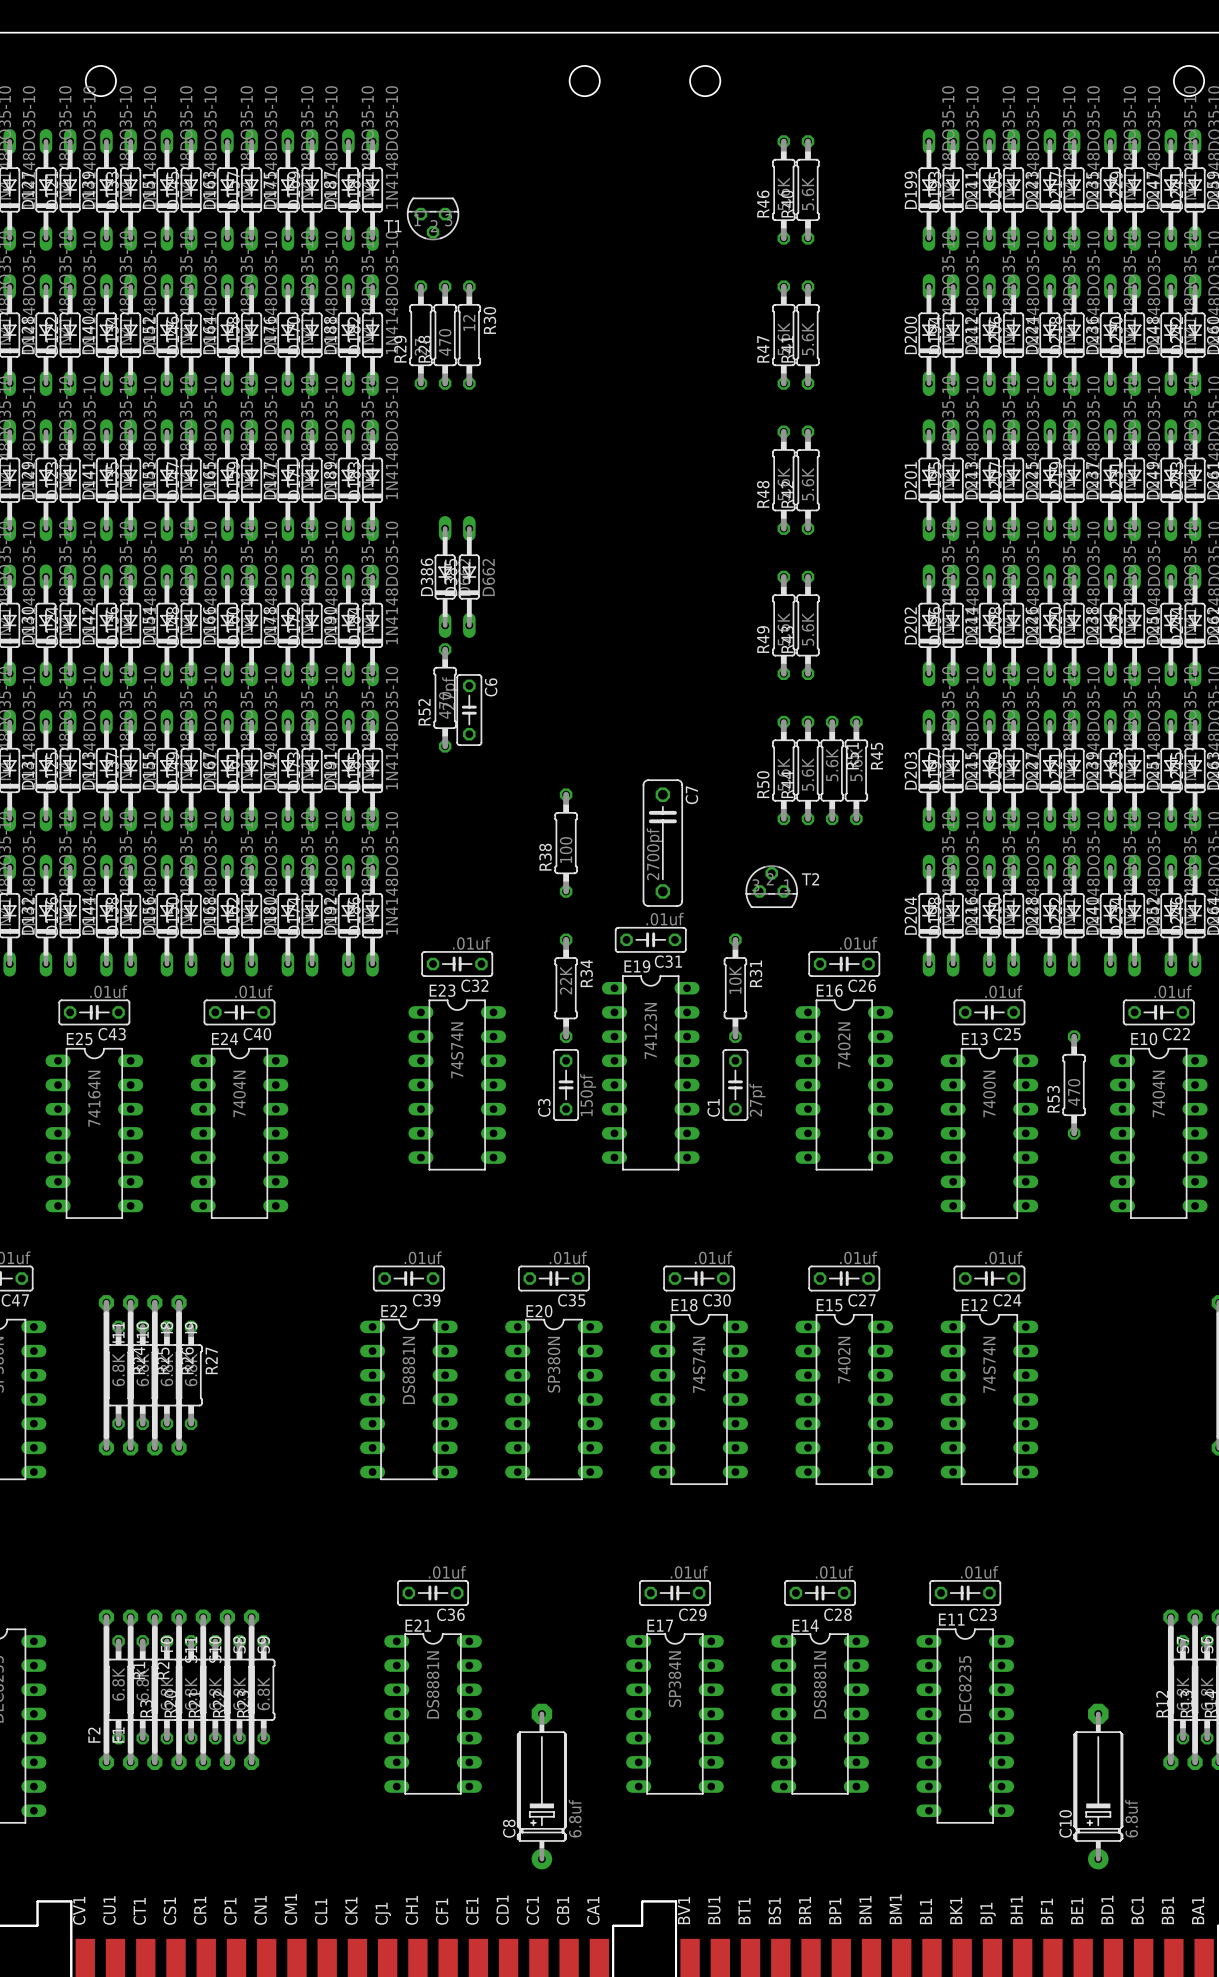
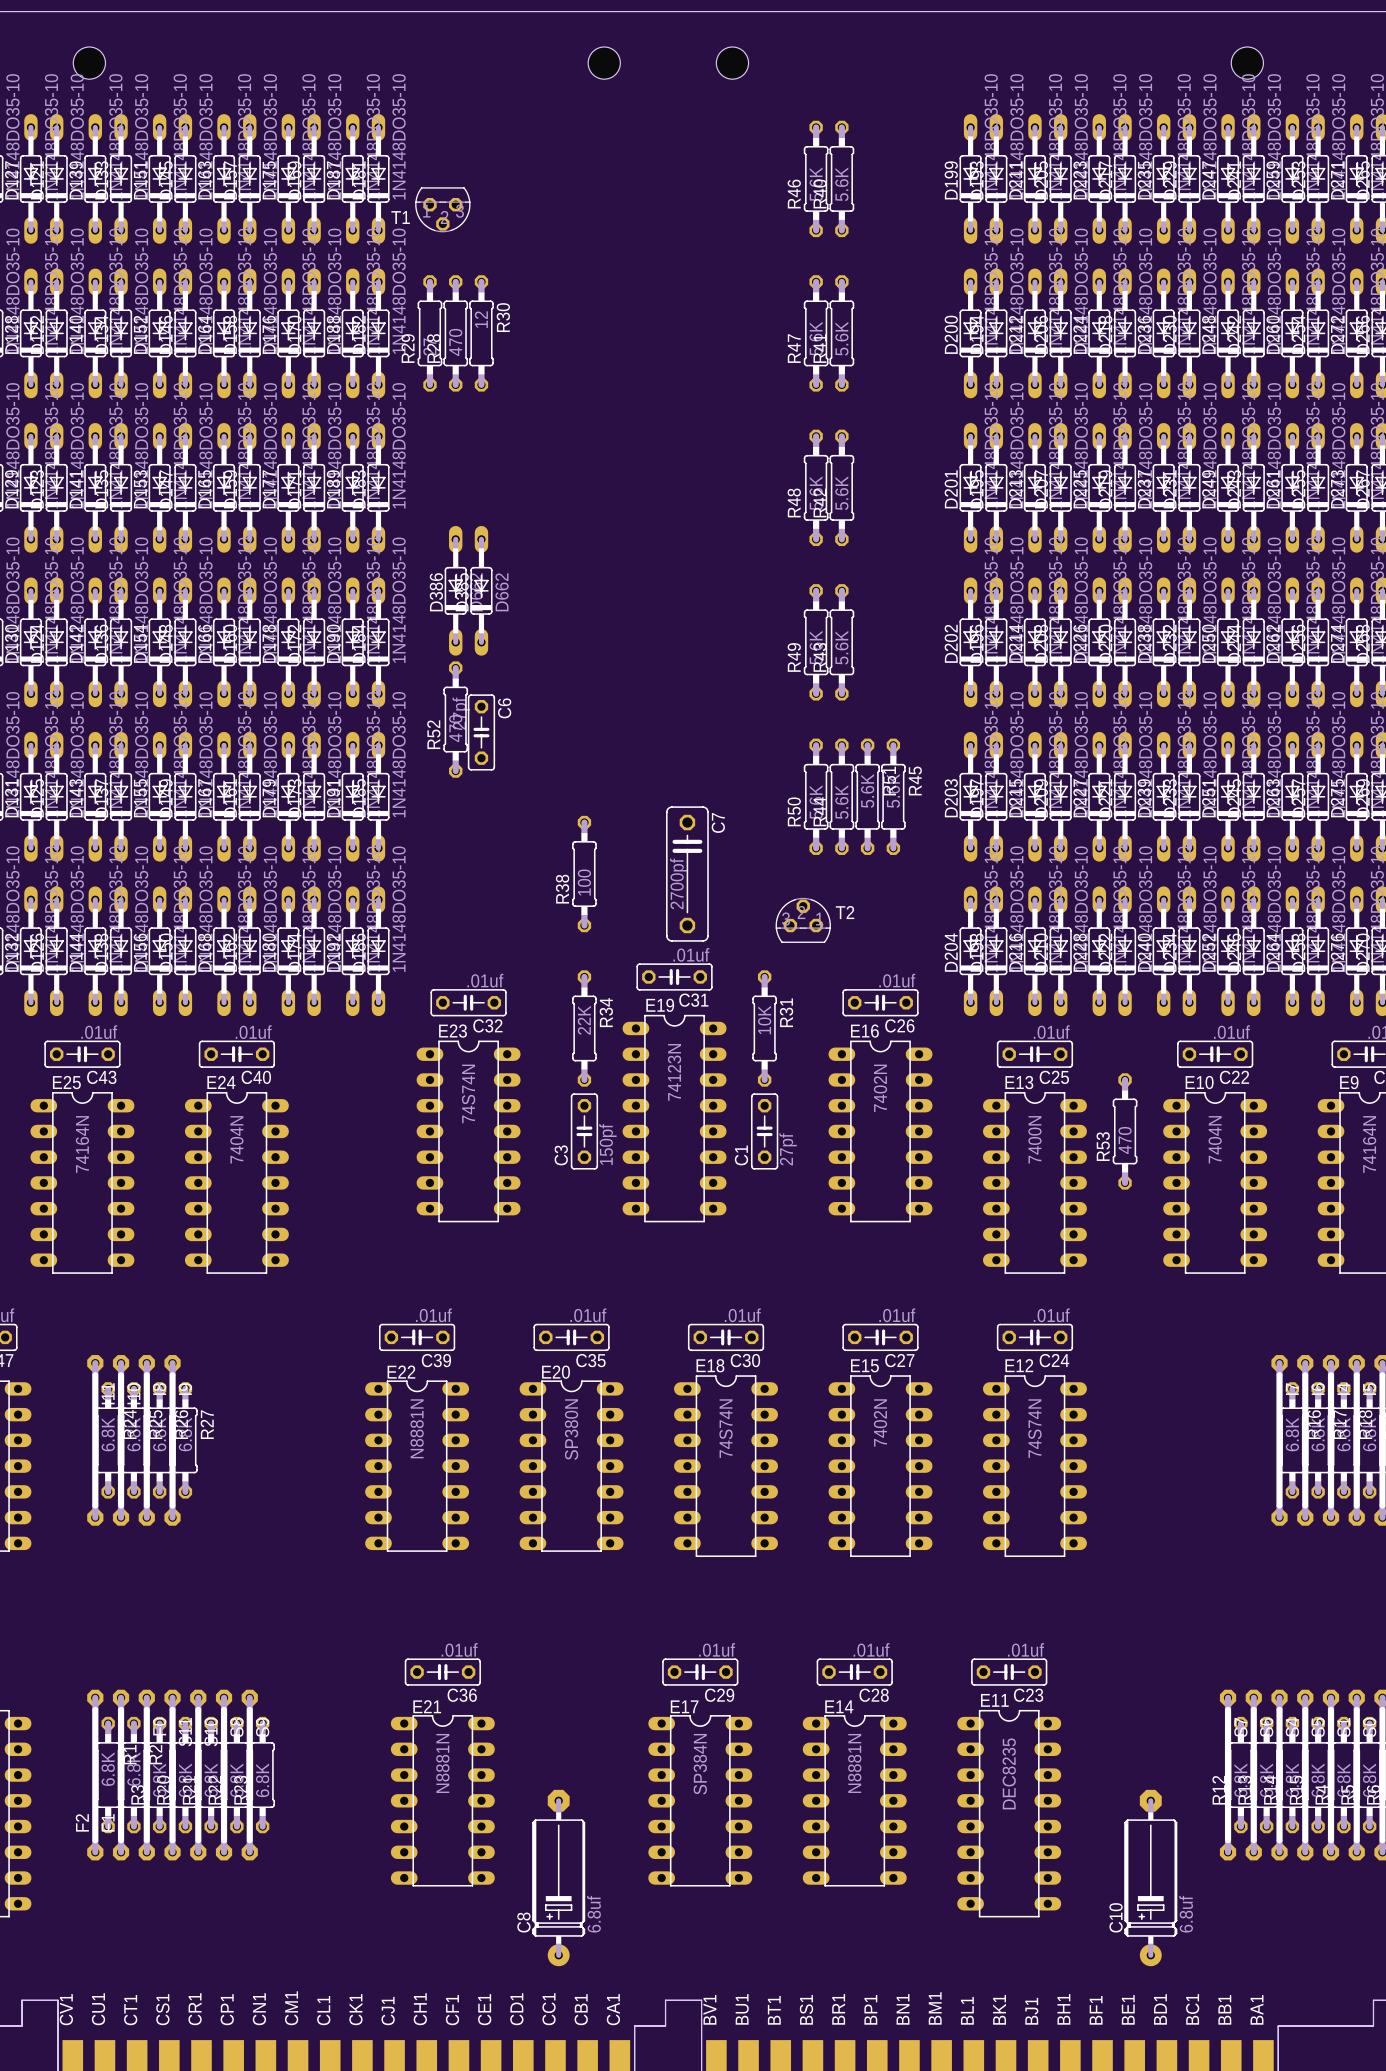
E22 value: DS8881N (408, 1370) -> N8881N (417, 1428)
E21 value: DS8881N (433, 1684) -> N8881N (442, 1763)
E14 value: DS8881N (820, 1684) -> N8881N (854, 1763)

